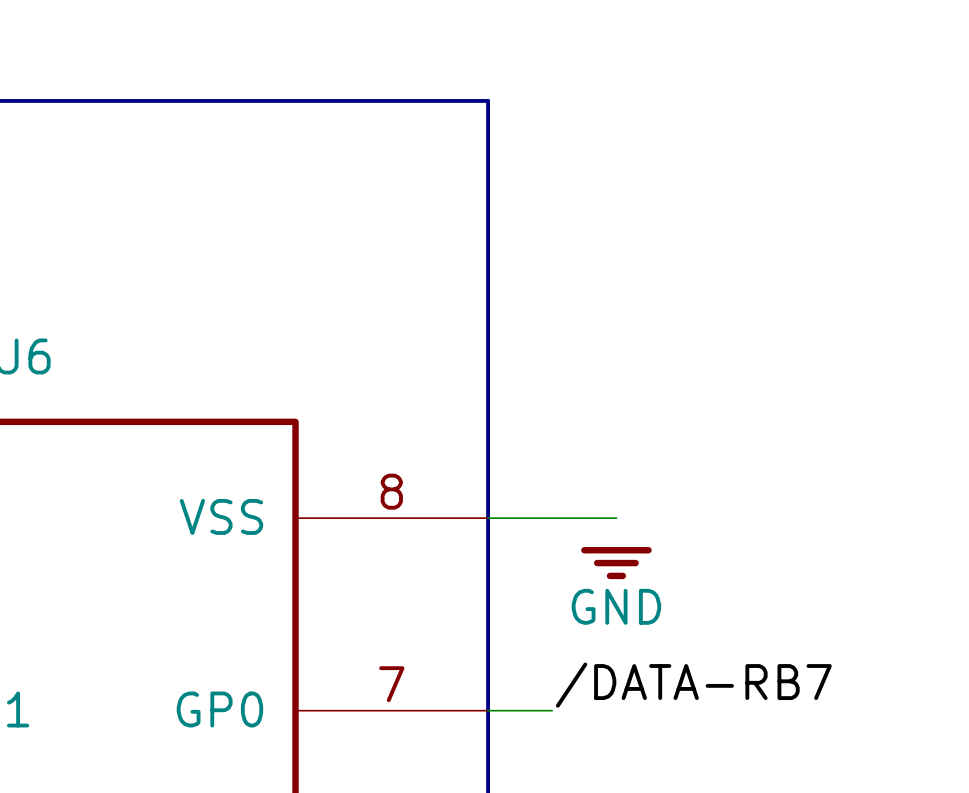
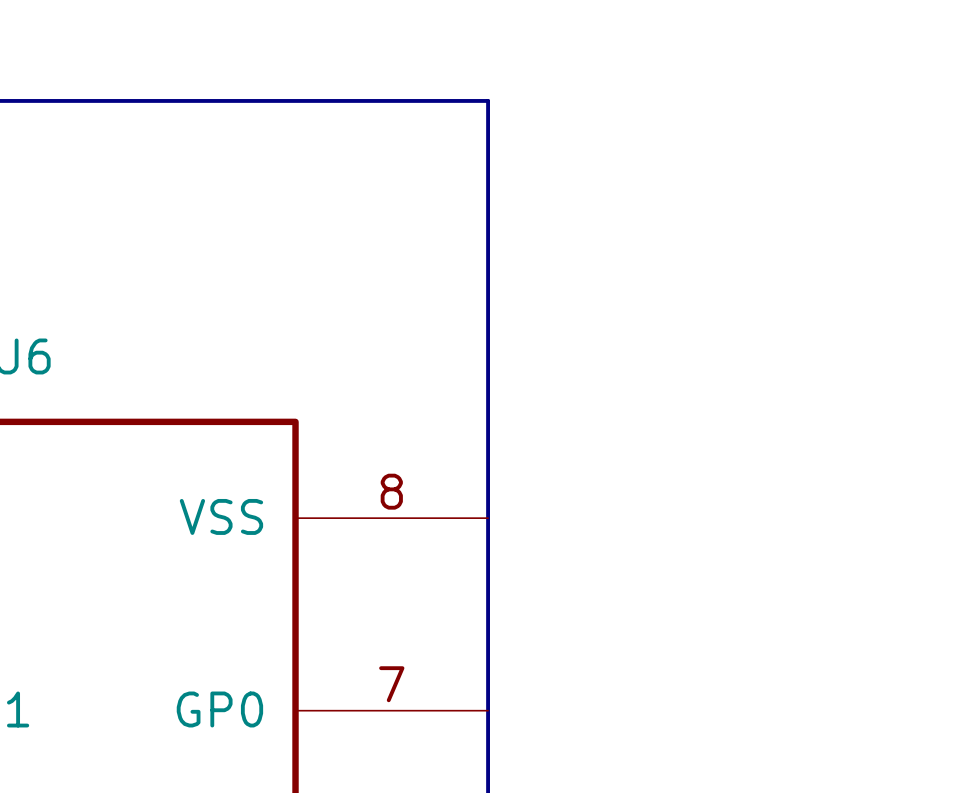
wire: (488, 518) (616, 518) -> none
power symbol: GND (616, 563) -> none
label: /DATA-RB7 (693, 685) -> none
wire: (488, 710) (552, 710) -> none

